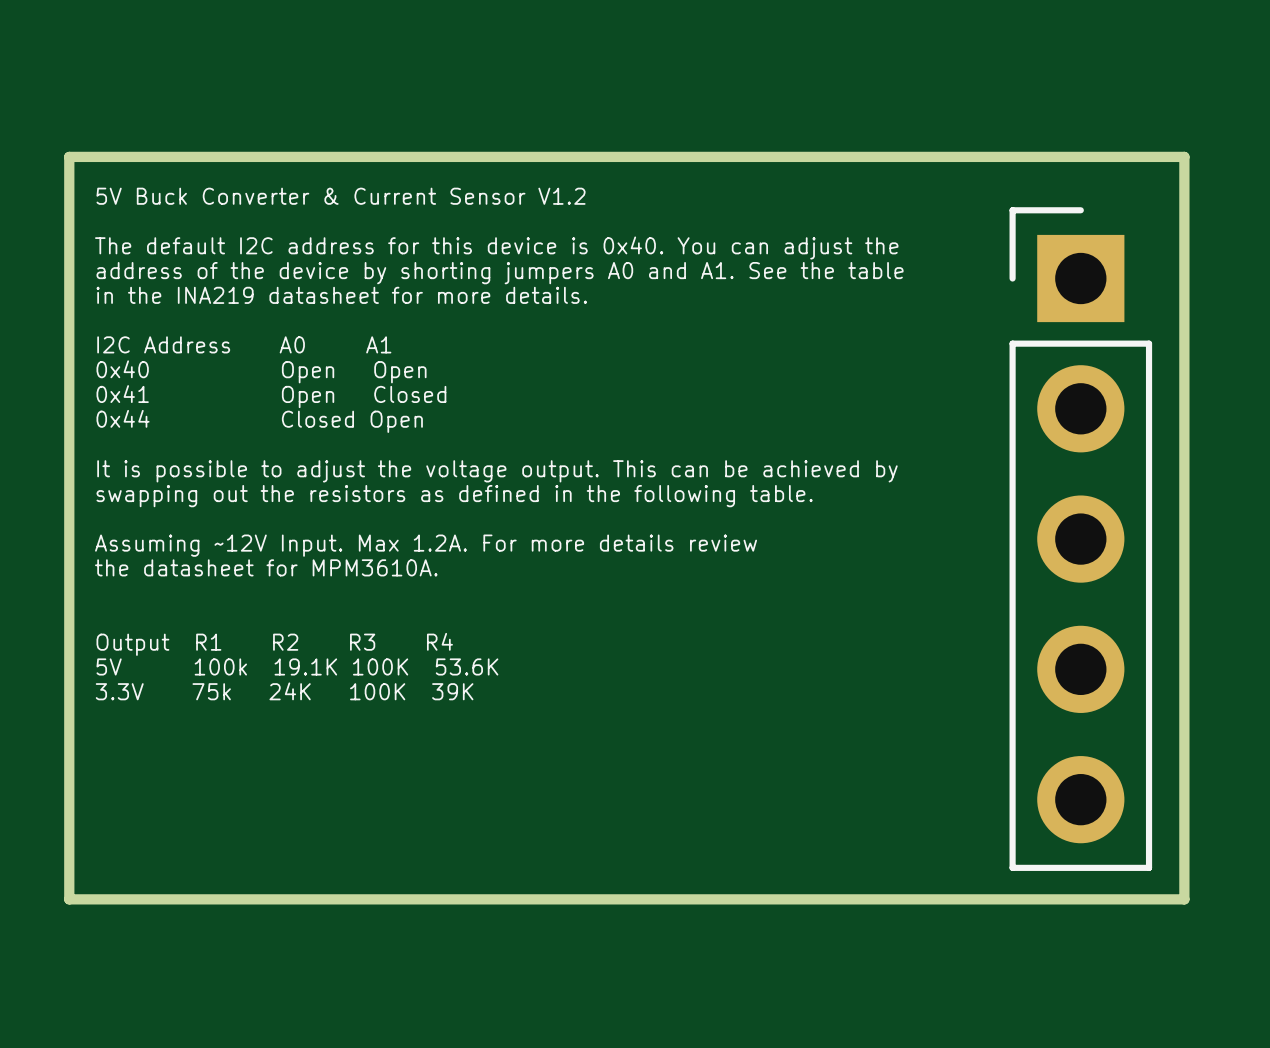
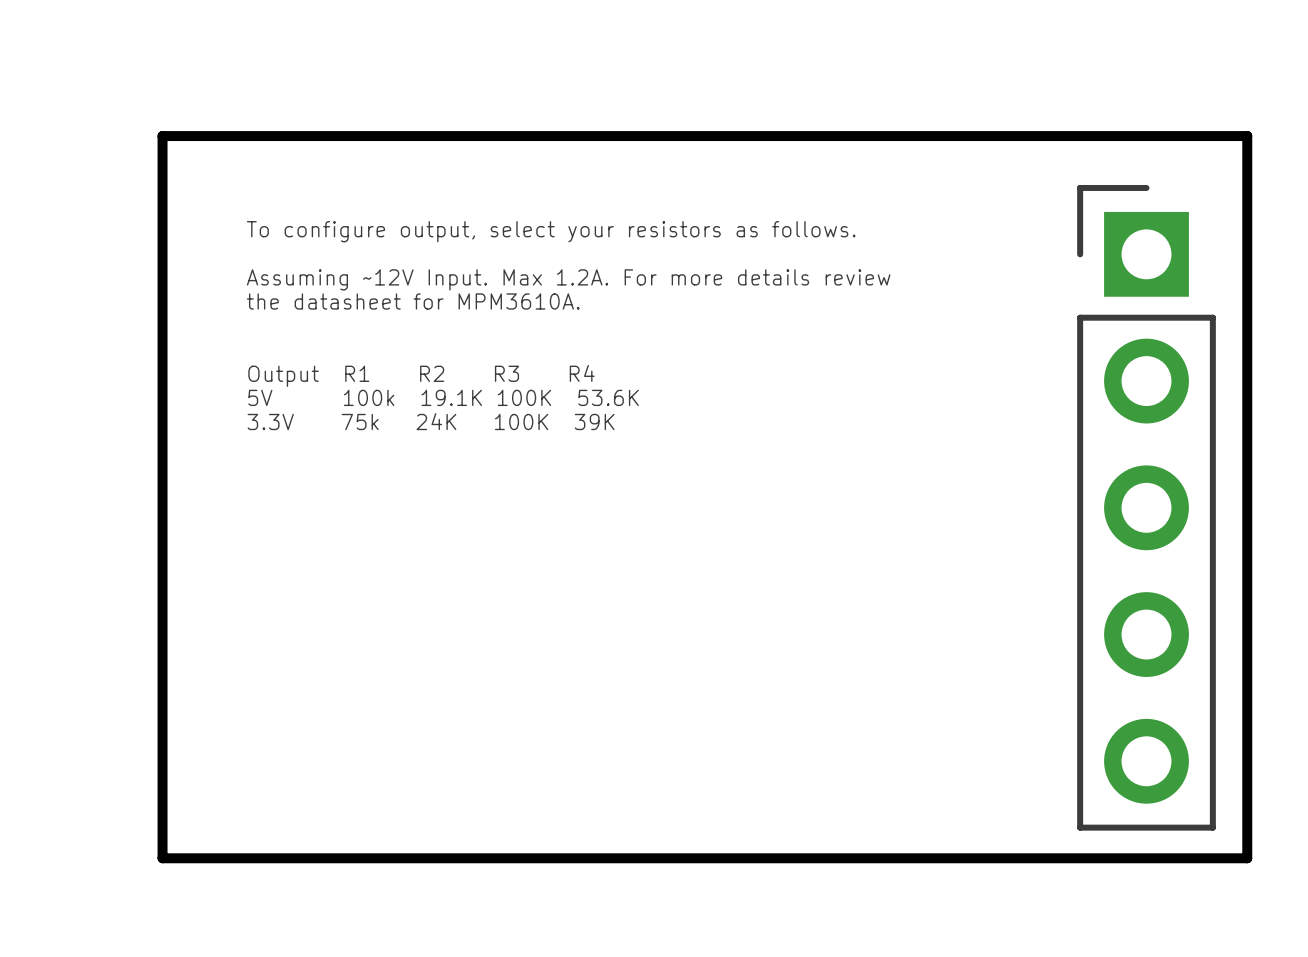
text: 5V Buck Converter & Current Sensor V1.2 (341, 196) -> none
text: The default I2C address for this device is 0x40. You can adjust the (496, 247) -> none
text: none -> To configure output, select your resistors as follows. (551, 231)
text: address of the device by shorting jumpers A0 and A1. See the table (500, 273) -> none
text: in the INA219 datasheet for more details. (341, 295) -> none
text: I2C Address A0 A1 (244, 344) -> none
text: 0x40 Open Open (261, 371) -> none
text: 0x41 Open Closed (271, 396) -> none
text: 0x44 Closed Open (259, 421) -> none
text: It is possible to adjust the voltage output. This can be achieved by (497, 471) -> none
text: swapping out the resistors as defined in the following table. (454, 496) -> none
text position: Assuming ~12V Input. Max 1.2A. For more details review (426, 545) -> Assuming ~12V Input. Max 1.2A. For more details review (568, 279)
text position: the datasheet for MPM3610A. (266, 567) -> the datasheet for MPM3610A. (413, 301)
text position: Output R1 R2 R3 R4 (274, 644) -> Output R1 R2 R3 R4 (421, 375)
text position: 5V 100k 19.1K 100K 53.6K (297, 666) -> 5V 100k 19.1K 100K 53.6K (443, 397)
text position: 3.3V 75k 24K 100K 39K (284, 691) -> 3.3V 75k 24K 100K 39K (431, 421)

